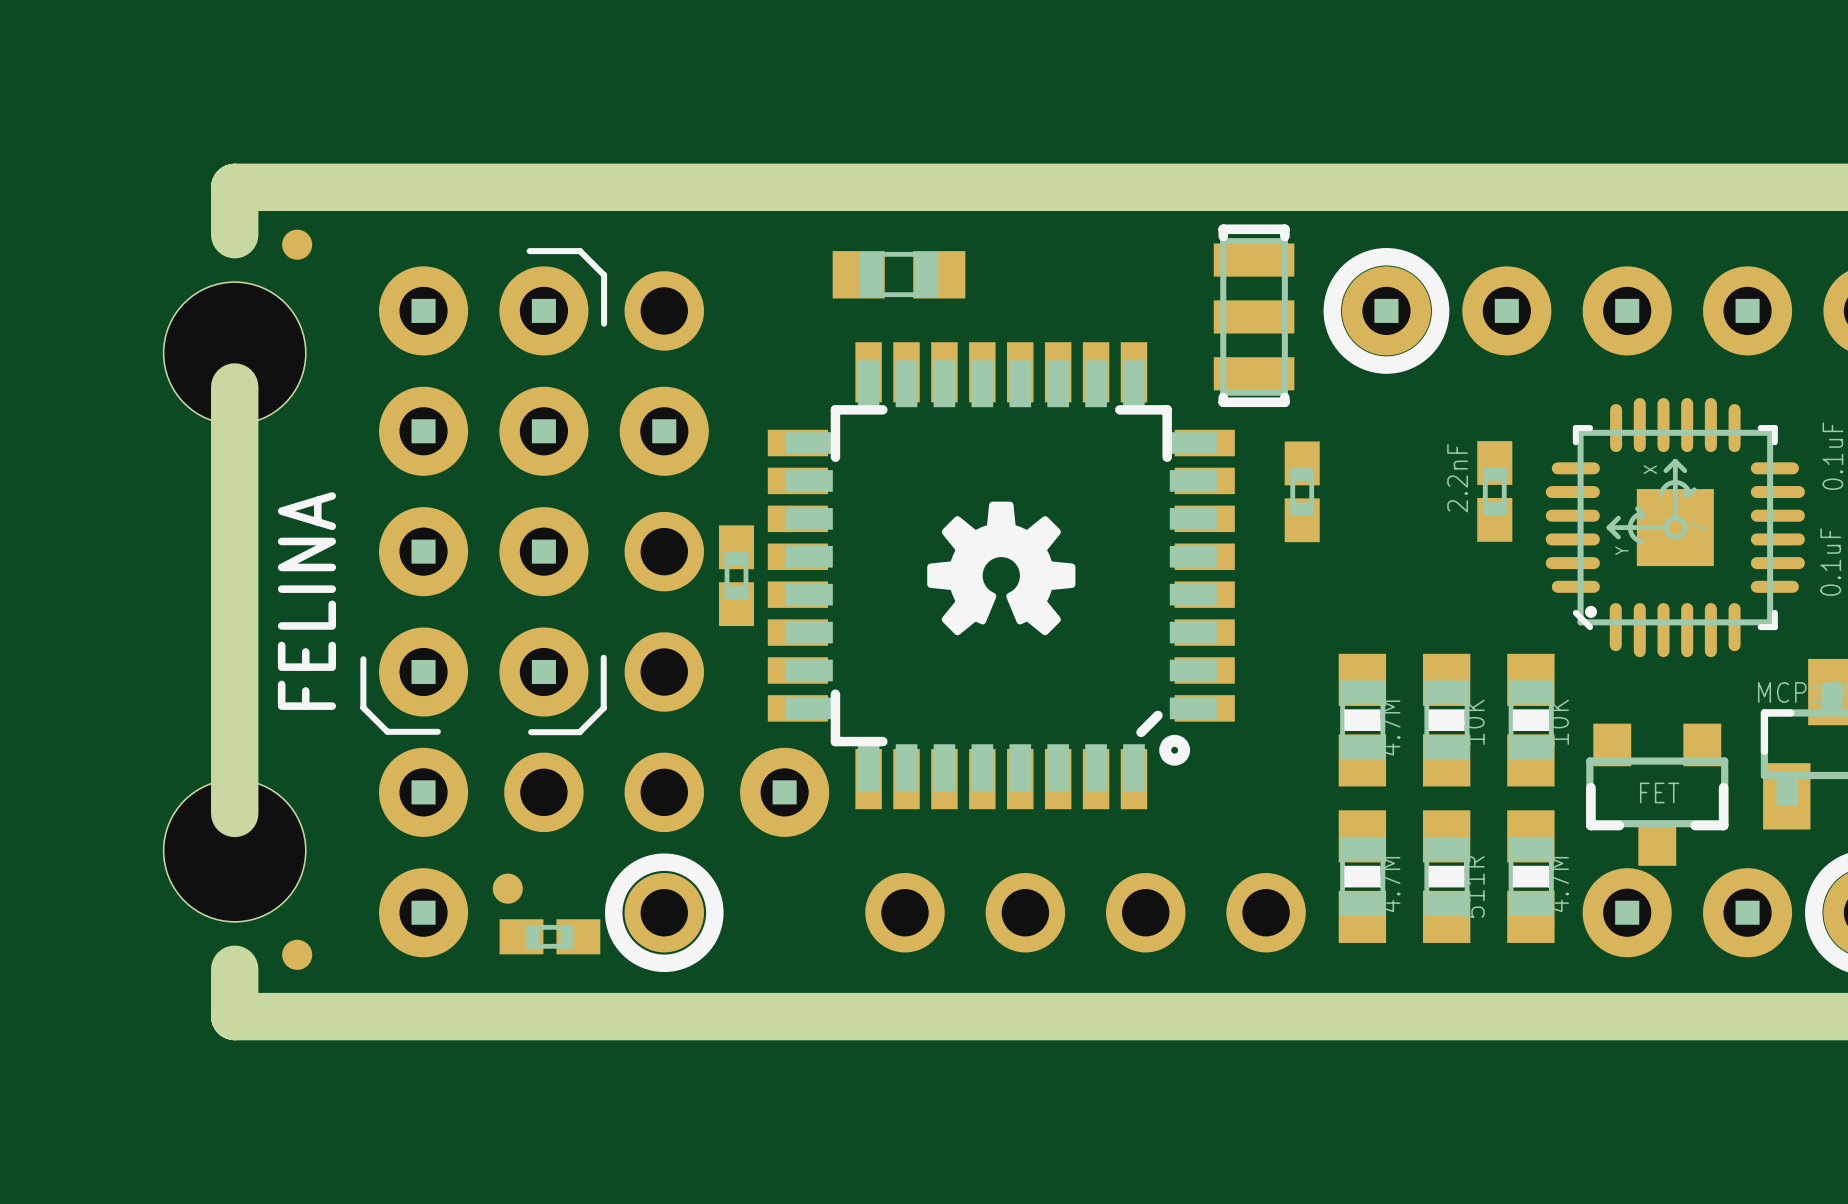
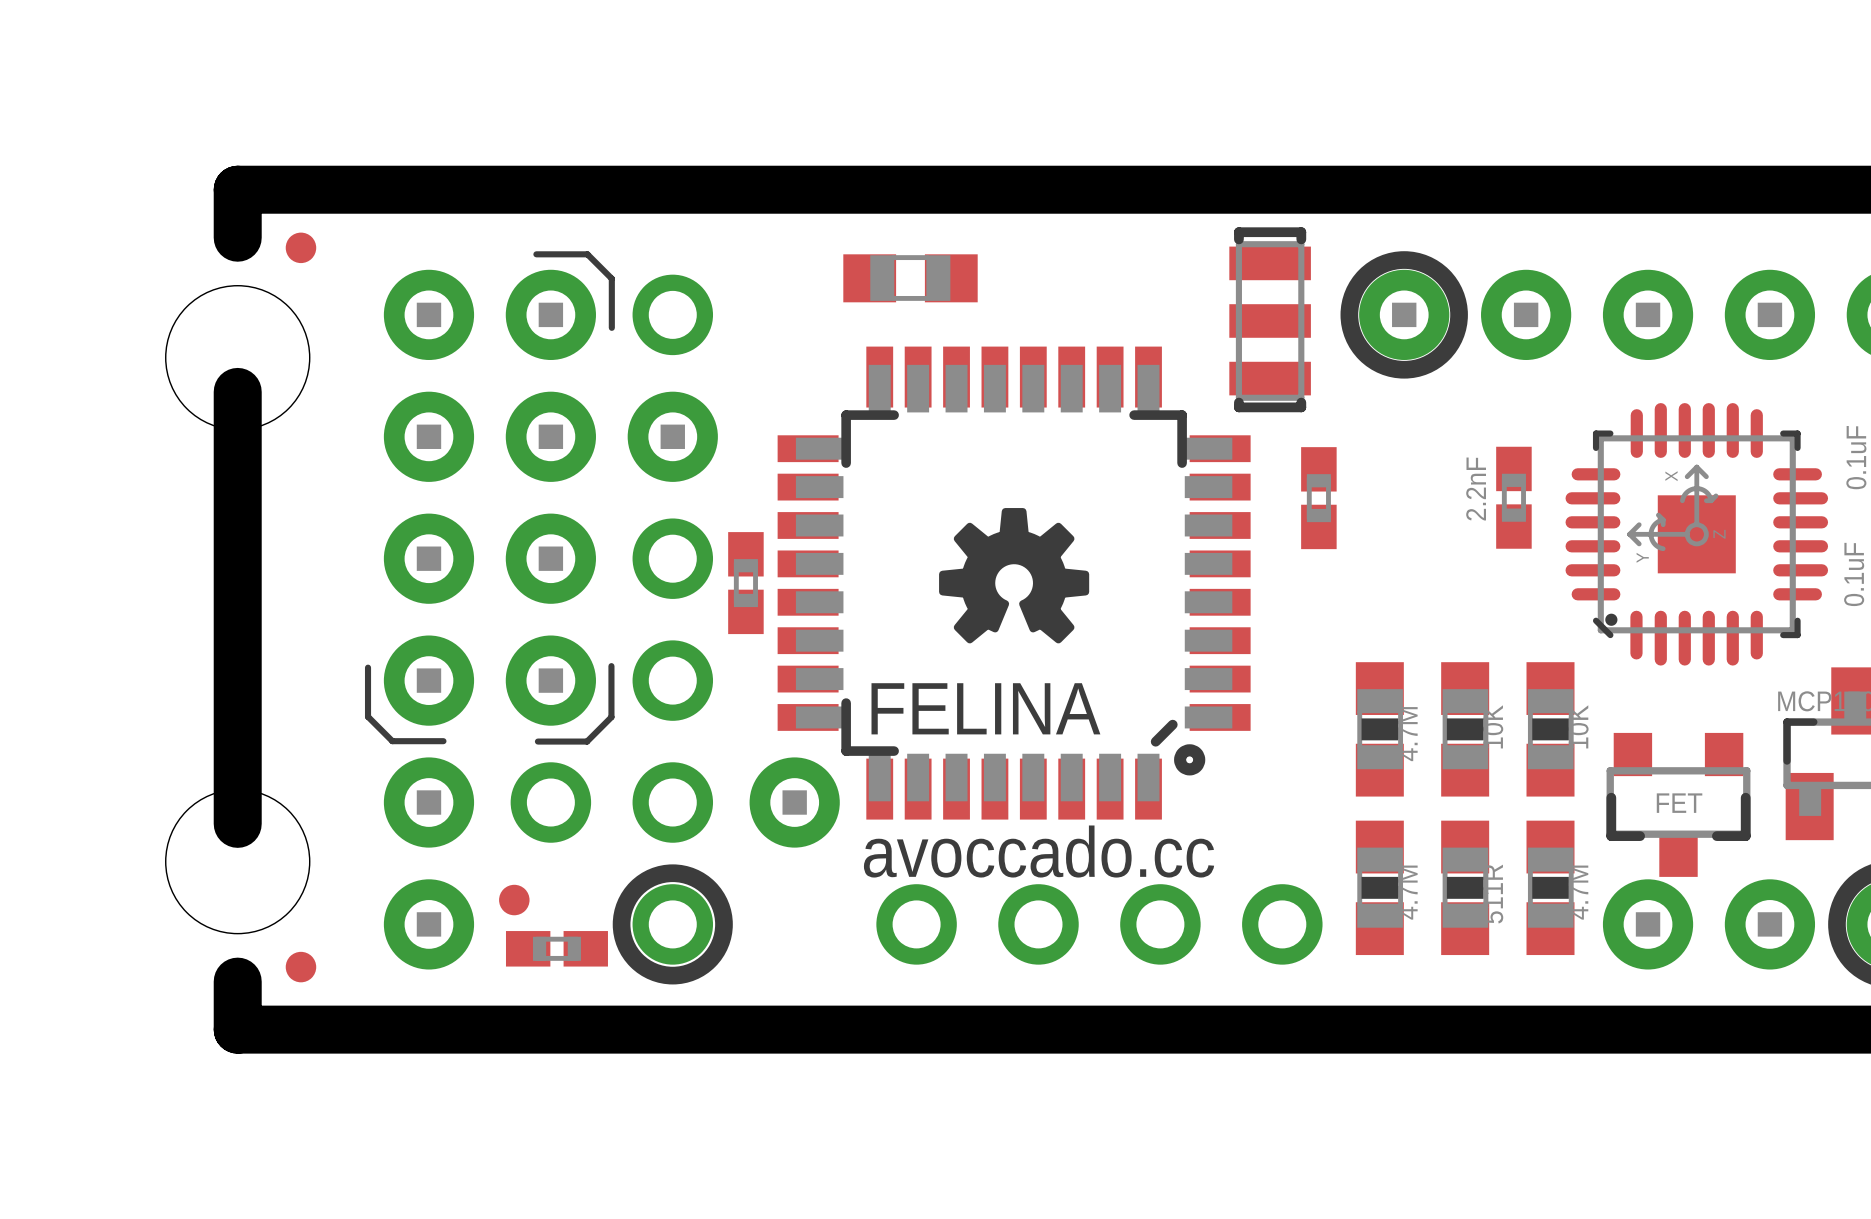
text rotation: 0° (306, 601) -> 90° clockwise (985, 708)
text position: FELINA (306, 601) -> FELINA (985, 708)
text: none -> avoccado.cc (1039, 851)

